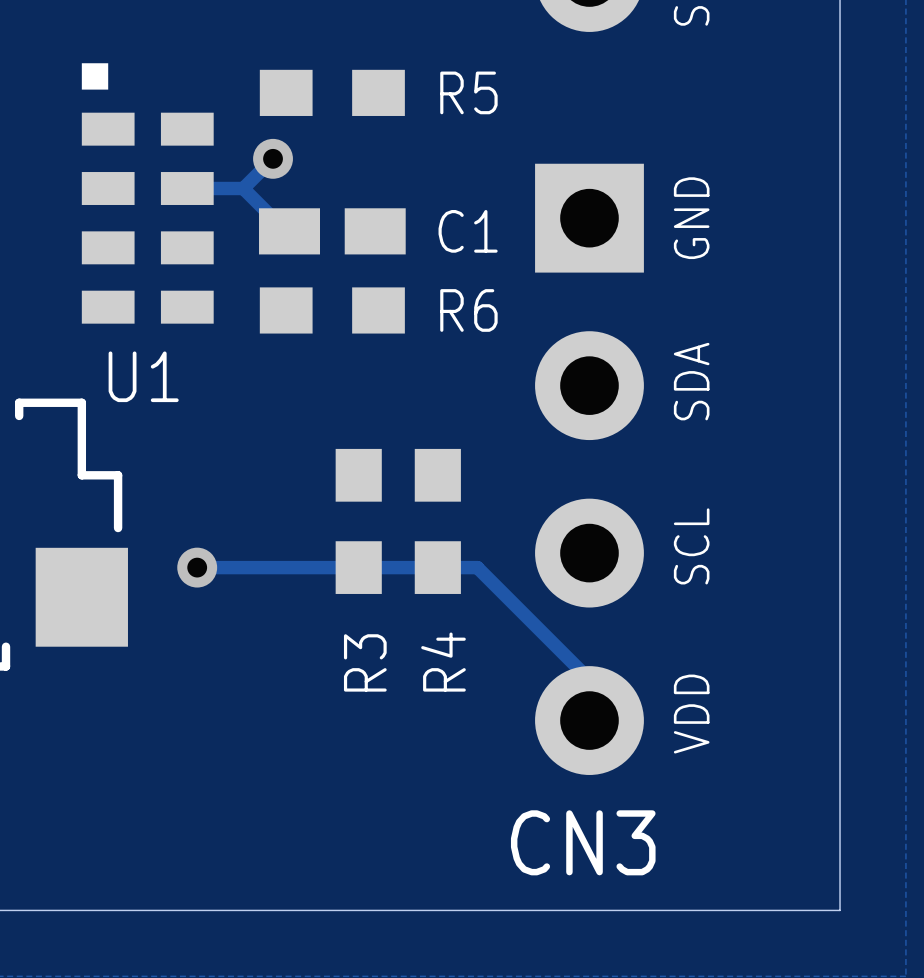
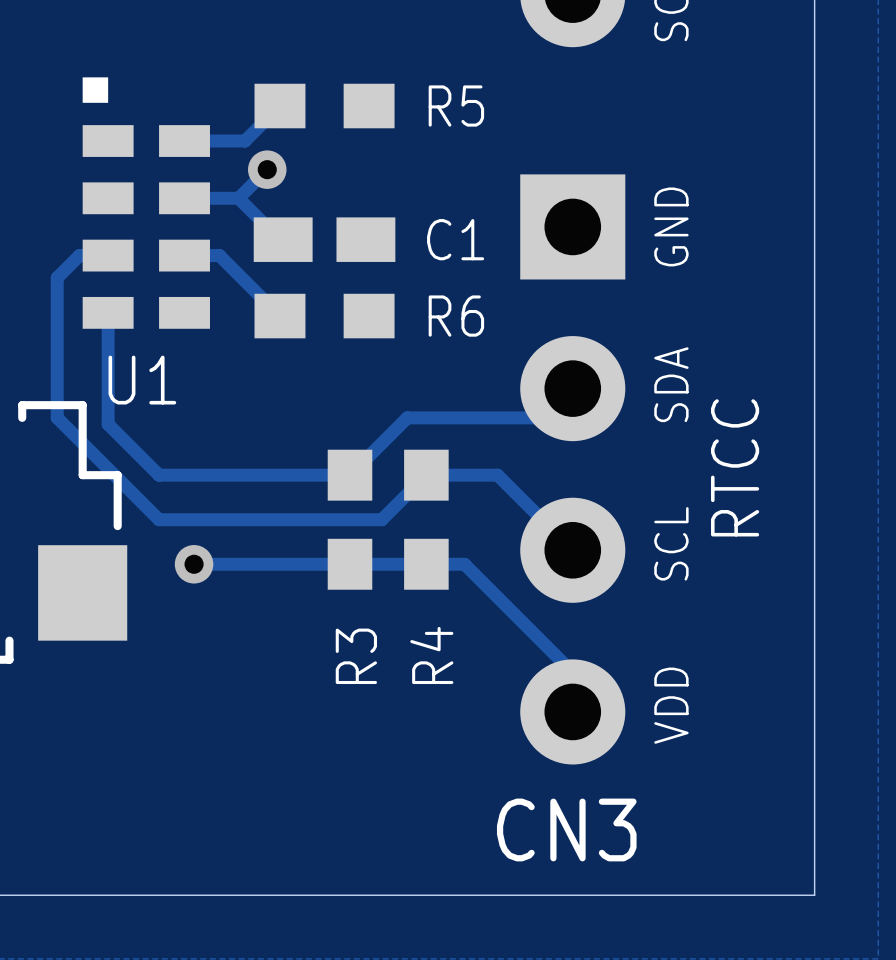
track: none -> (279, 106) (244, 141) (184, 141)
track: none -> (108, 255) (79, 255) (57, 277) (57, 417) (159, 519) (381, 519) (426, 475) (497, 475) (572, 550)
track: none -> (184, 255) (219, 255) (279, 316)
track: none -> (108, 312) (108, 424) (159, 475) (350, 475) (407, 417) (543, 417) (572, 388)
text: none -> RTCC (735, 467)

